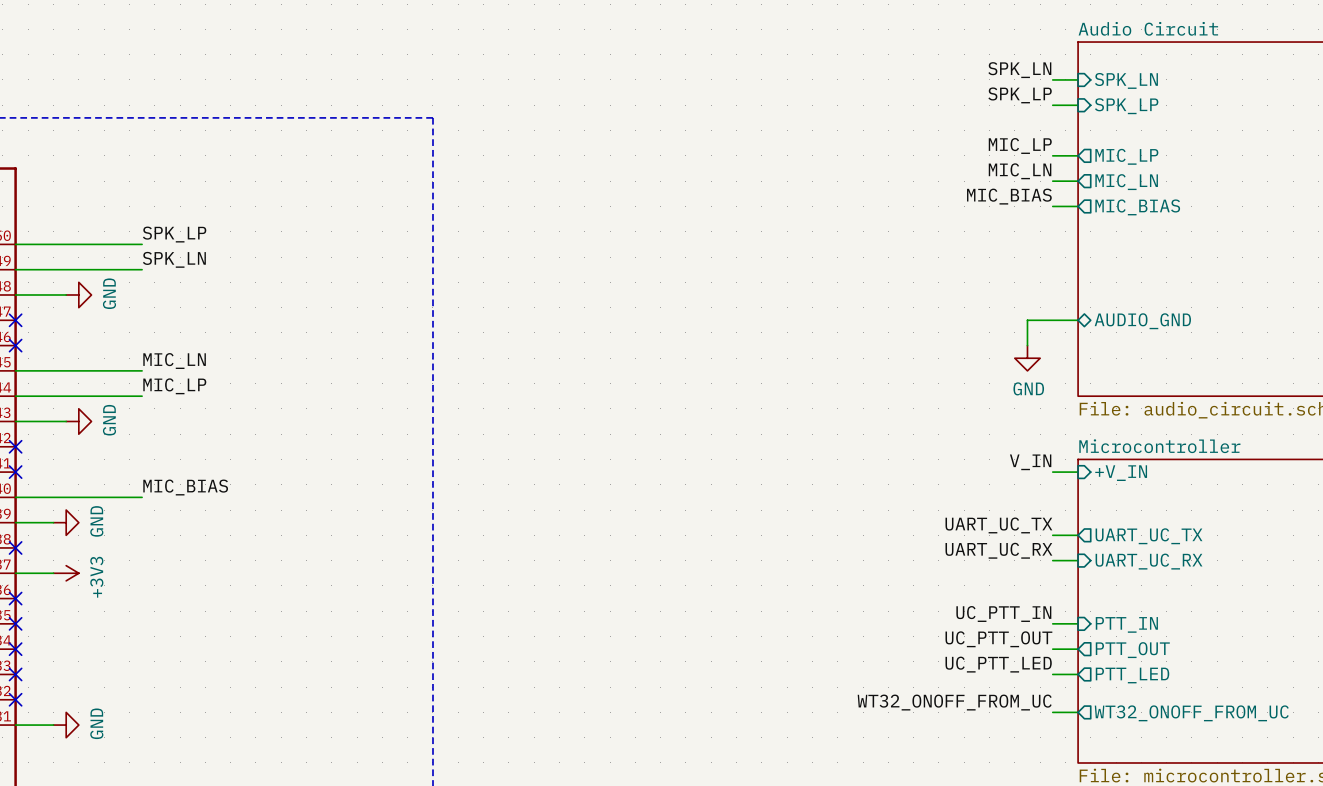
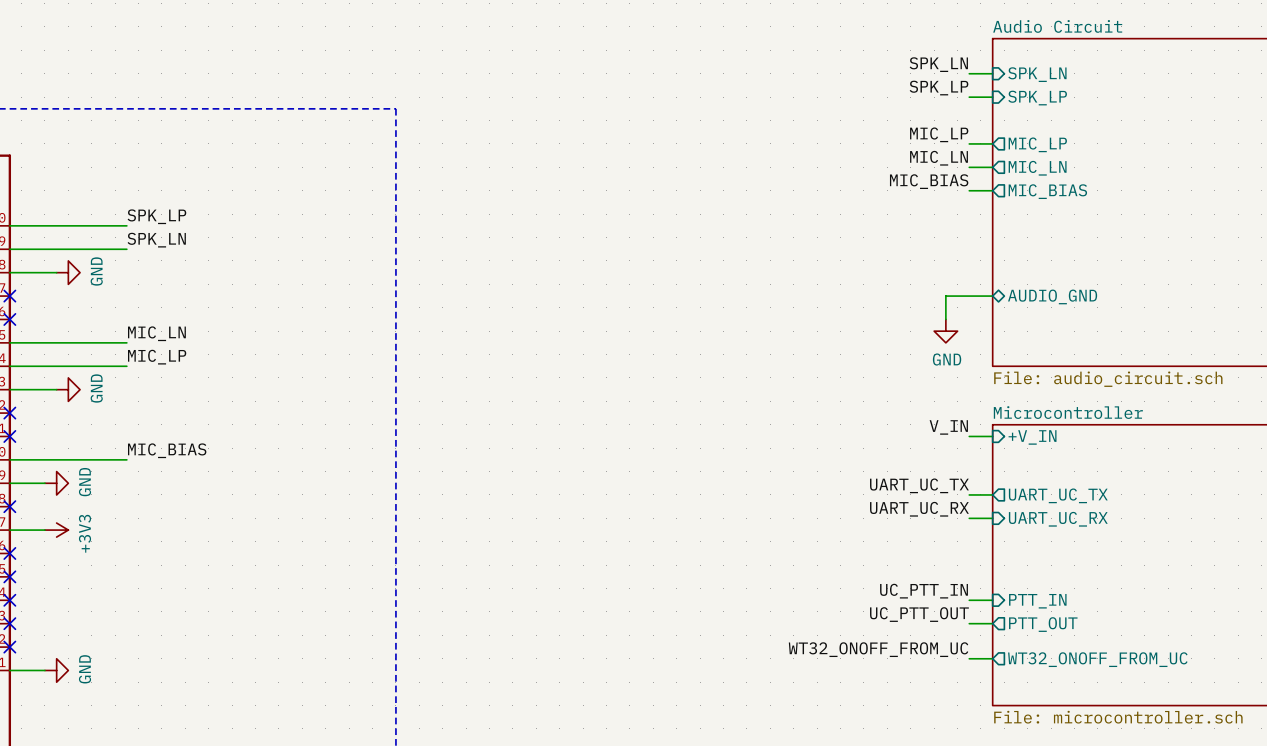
label: UC_PTT_IN (1003, 613) -> none
wire: (1052, 623) (1078, 623) -> none
sheet pin: PTT_IN (1126, 624) -> none
label: UC_PTT_OUT (998, 639) -> UC_PTT_IN (924, 591)
sheet pin shape: output (1132, 650) -> input (1037, 601)
sheet pin: PTT_OUT (1132, 650) -> PTT_IN (1037, 601)
label: UC_PTT_LED (998, 664) -> UC_PTT_OUT (919, 614)
sheet pin: PTT_LED (1132, 675) -> PTT_OUT (1043, 624)

